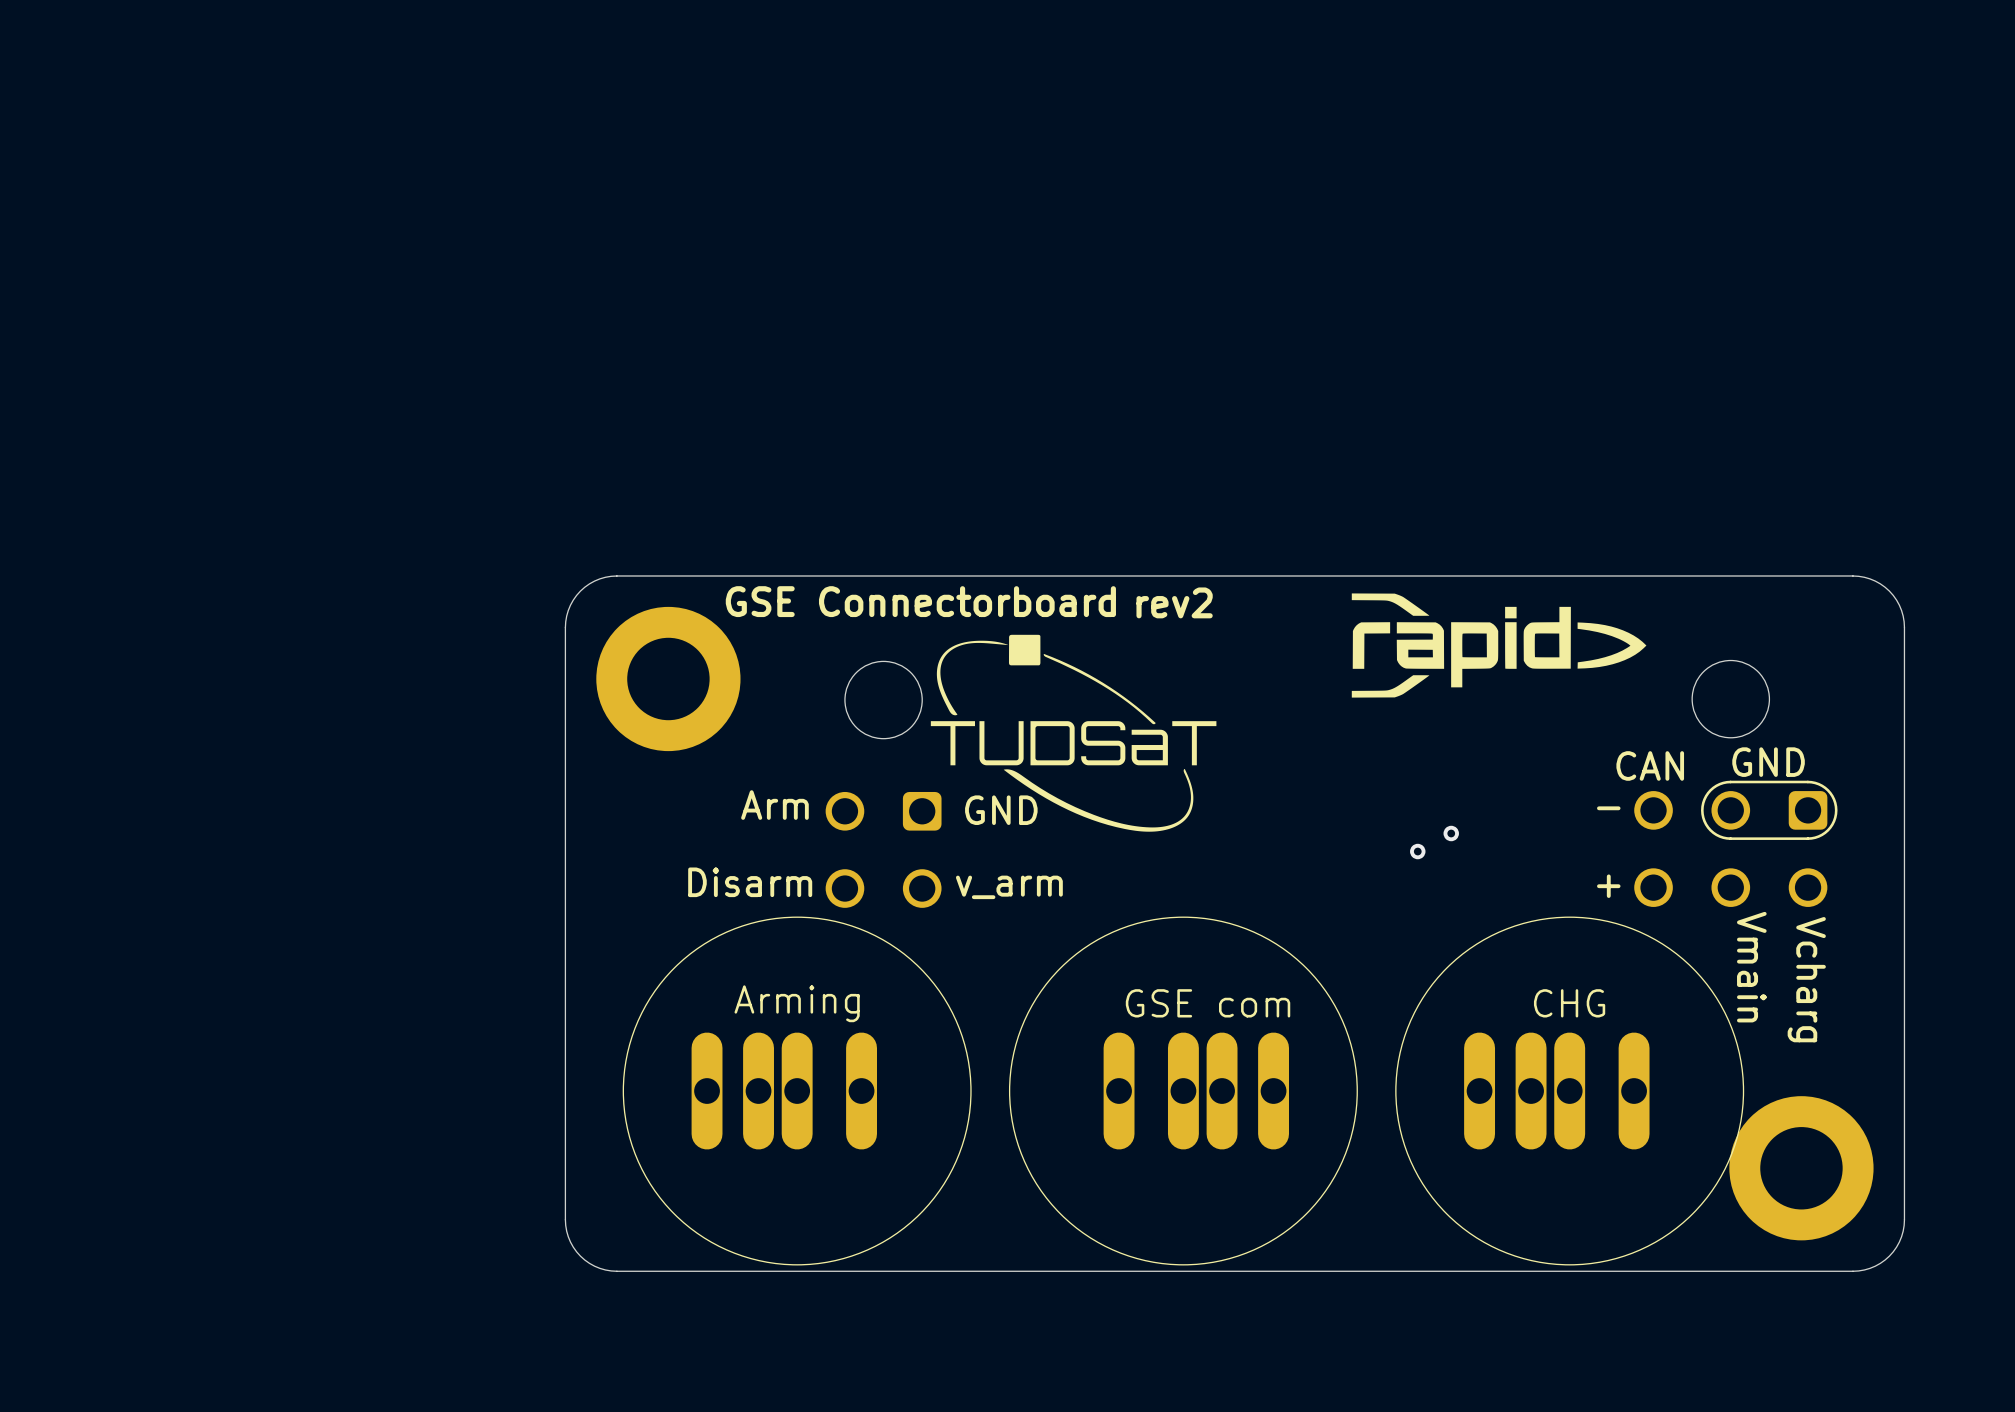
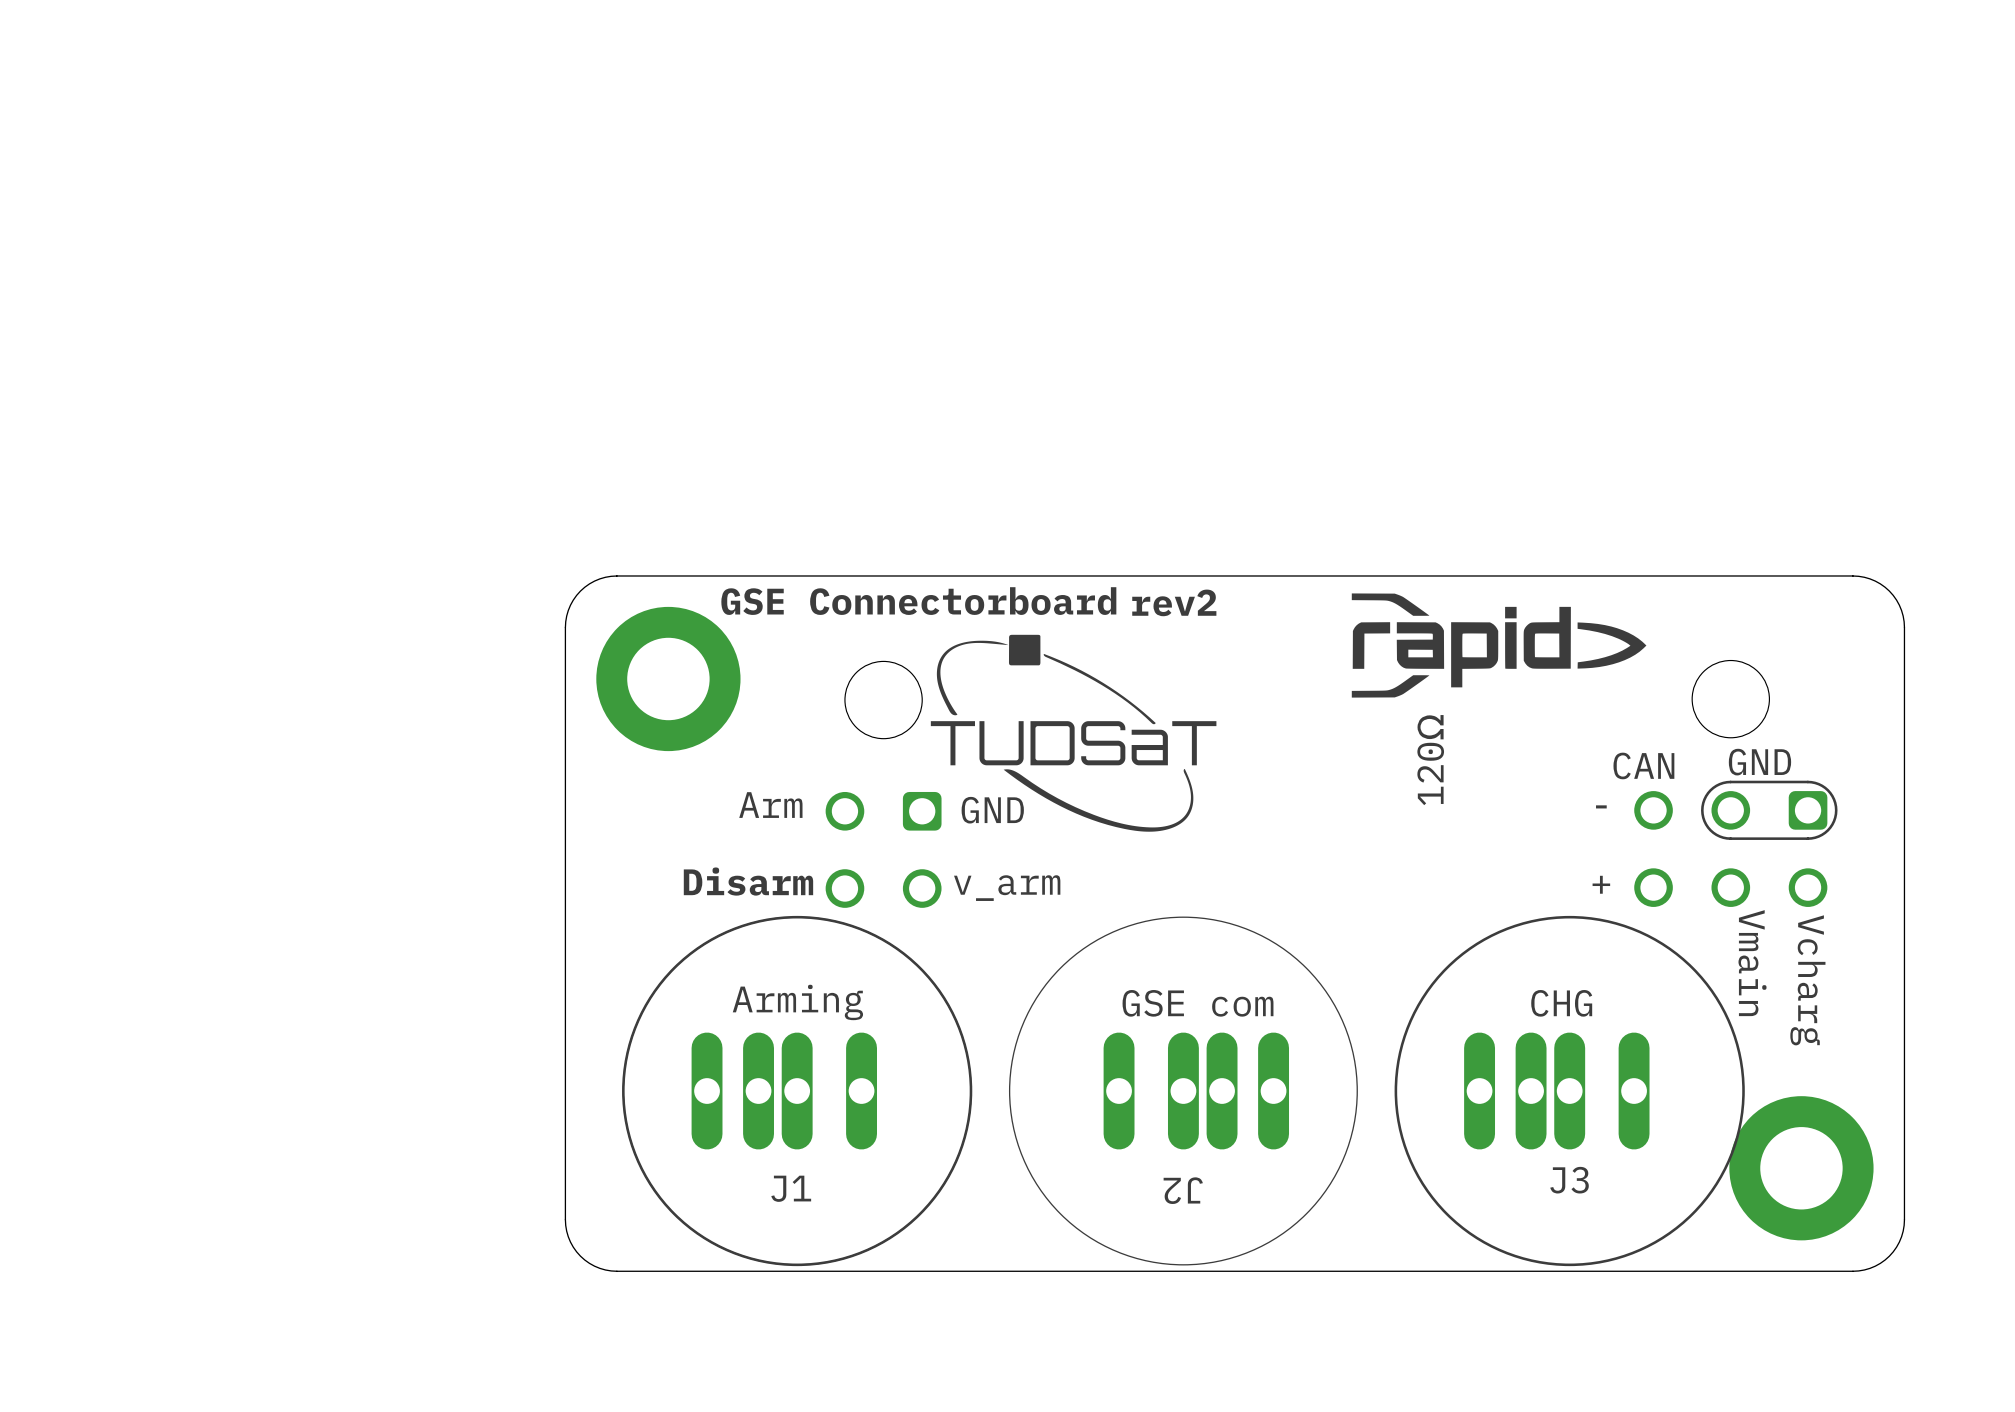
text: none -> 120Ω (1430, 760)
via: (1451, 833) -> none
via: (1417, 851) -> none
part: (797, 1091) -> none
J1: none -> (797, 1091)
part: (1569, 1091) -> none
J3: none -> (1569, 1091)
J2 name: none -> J2 (1183, 1190)

